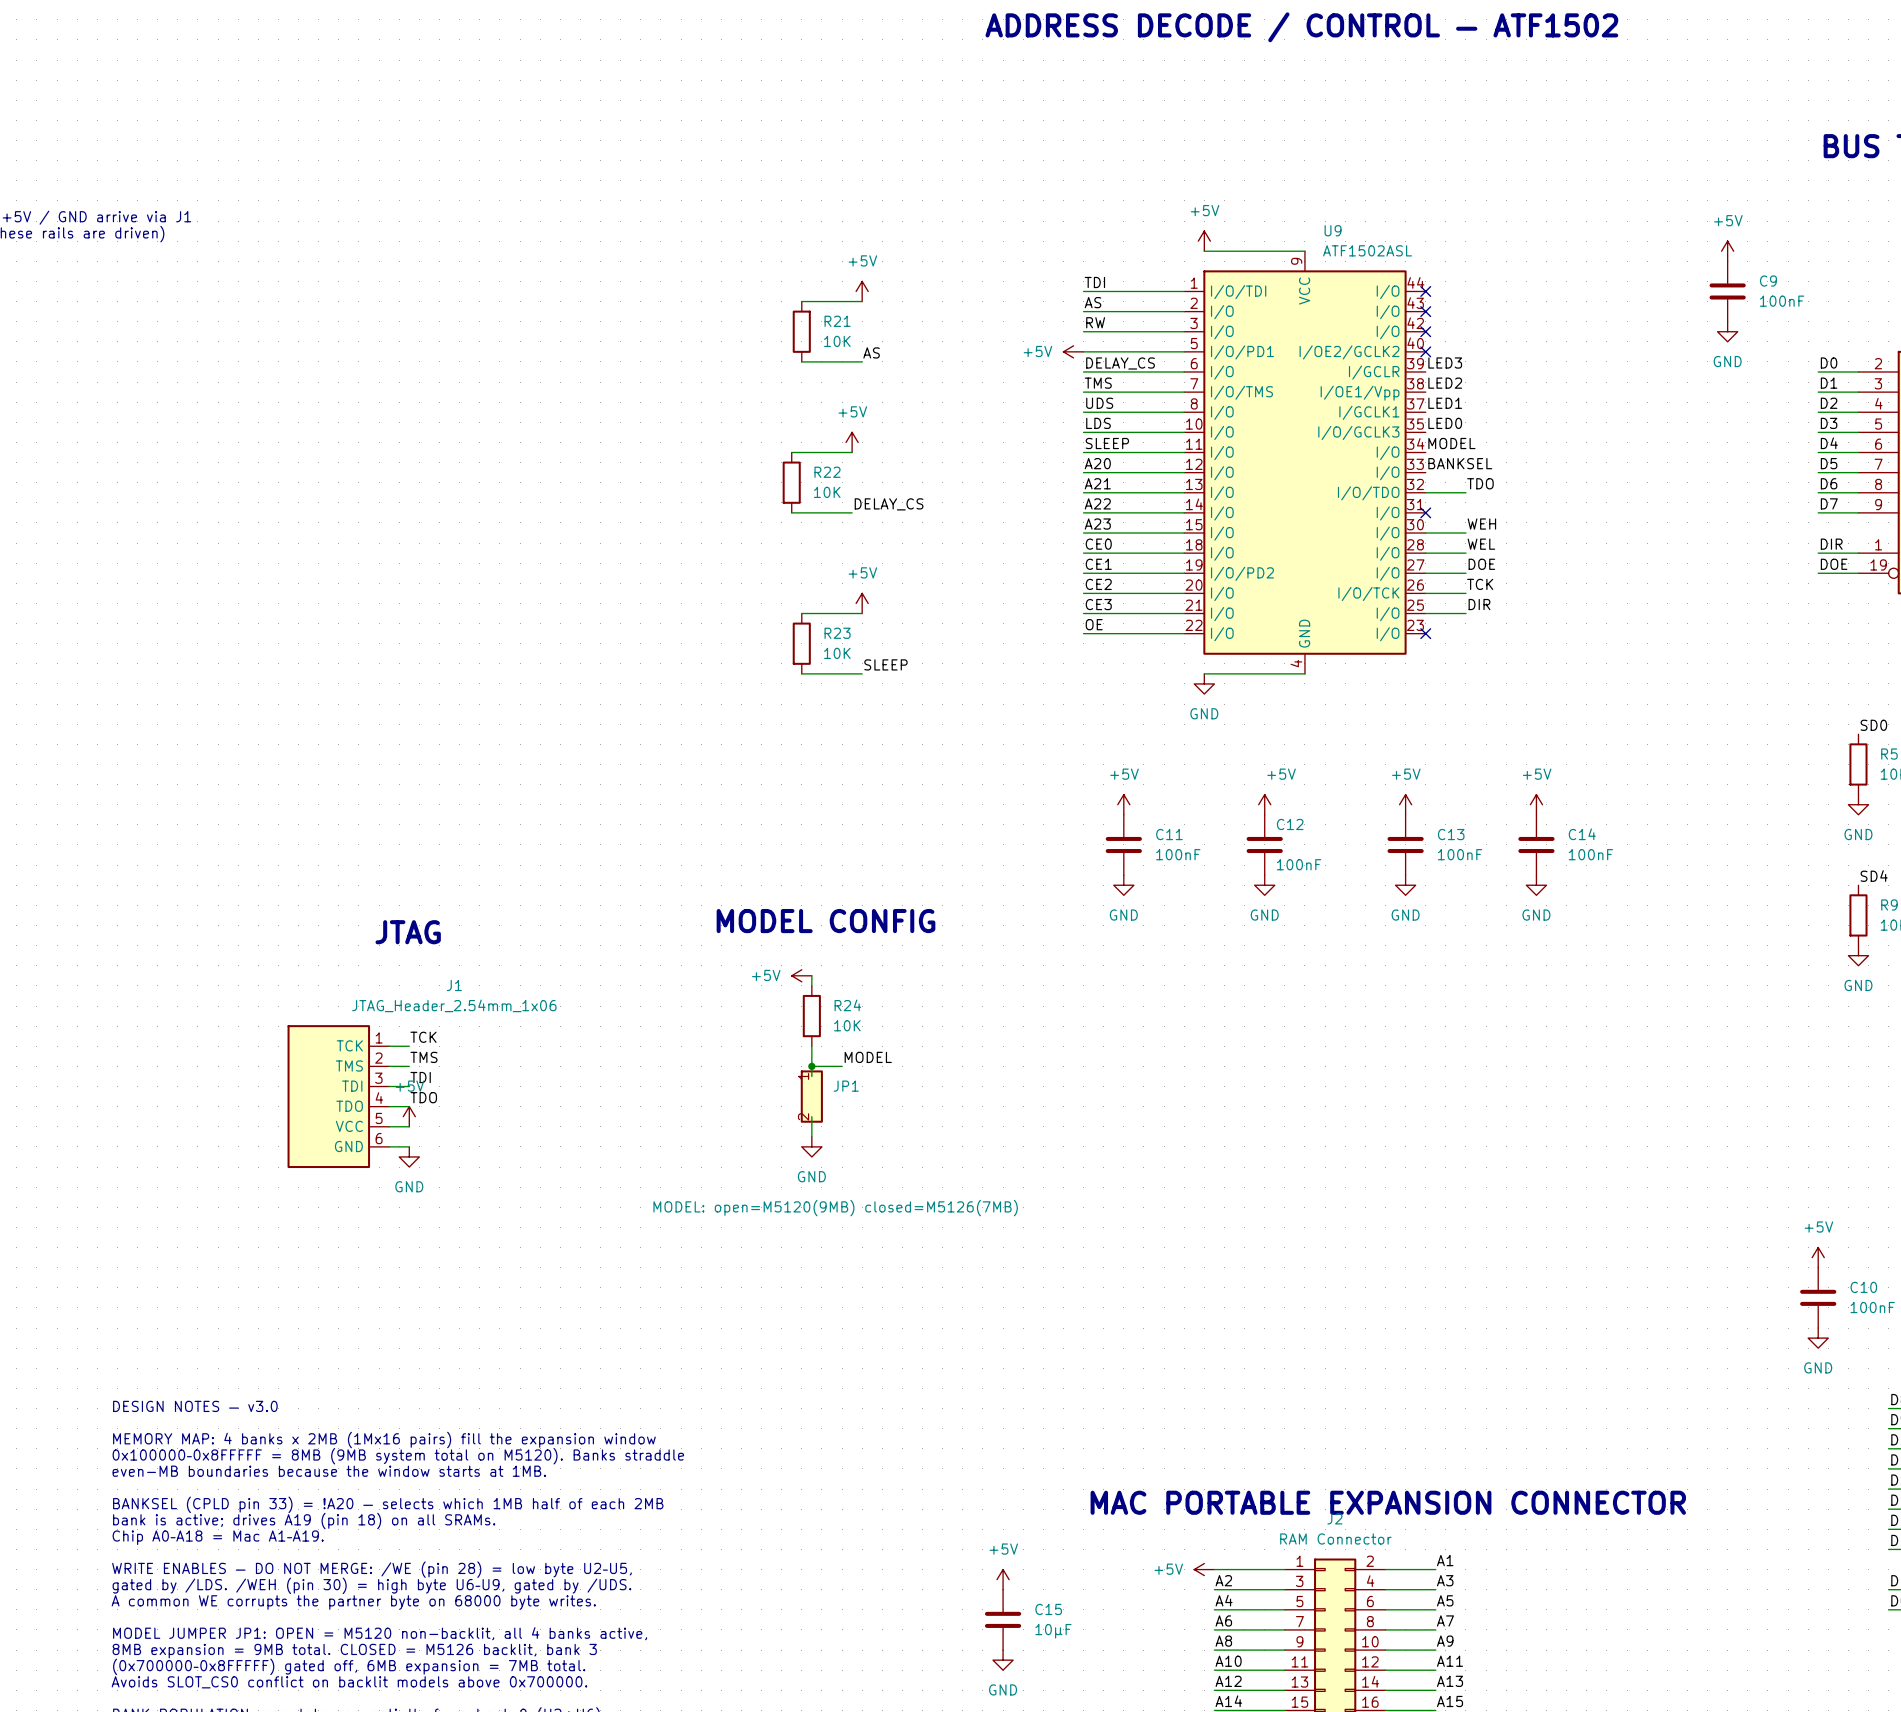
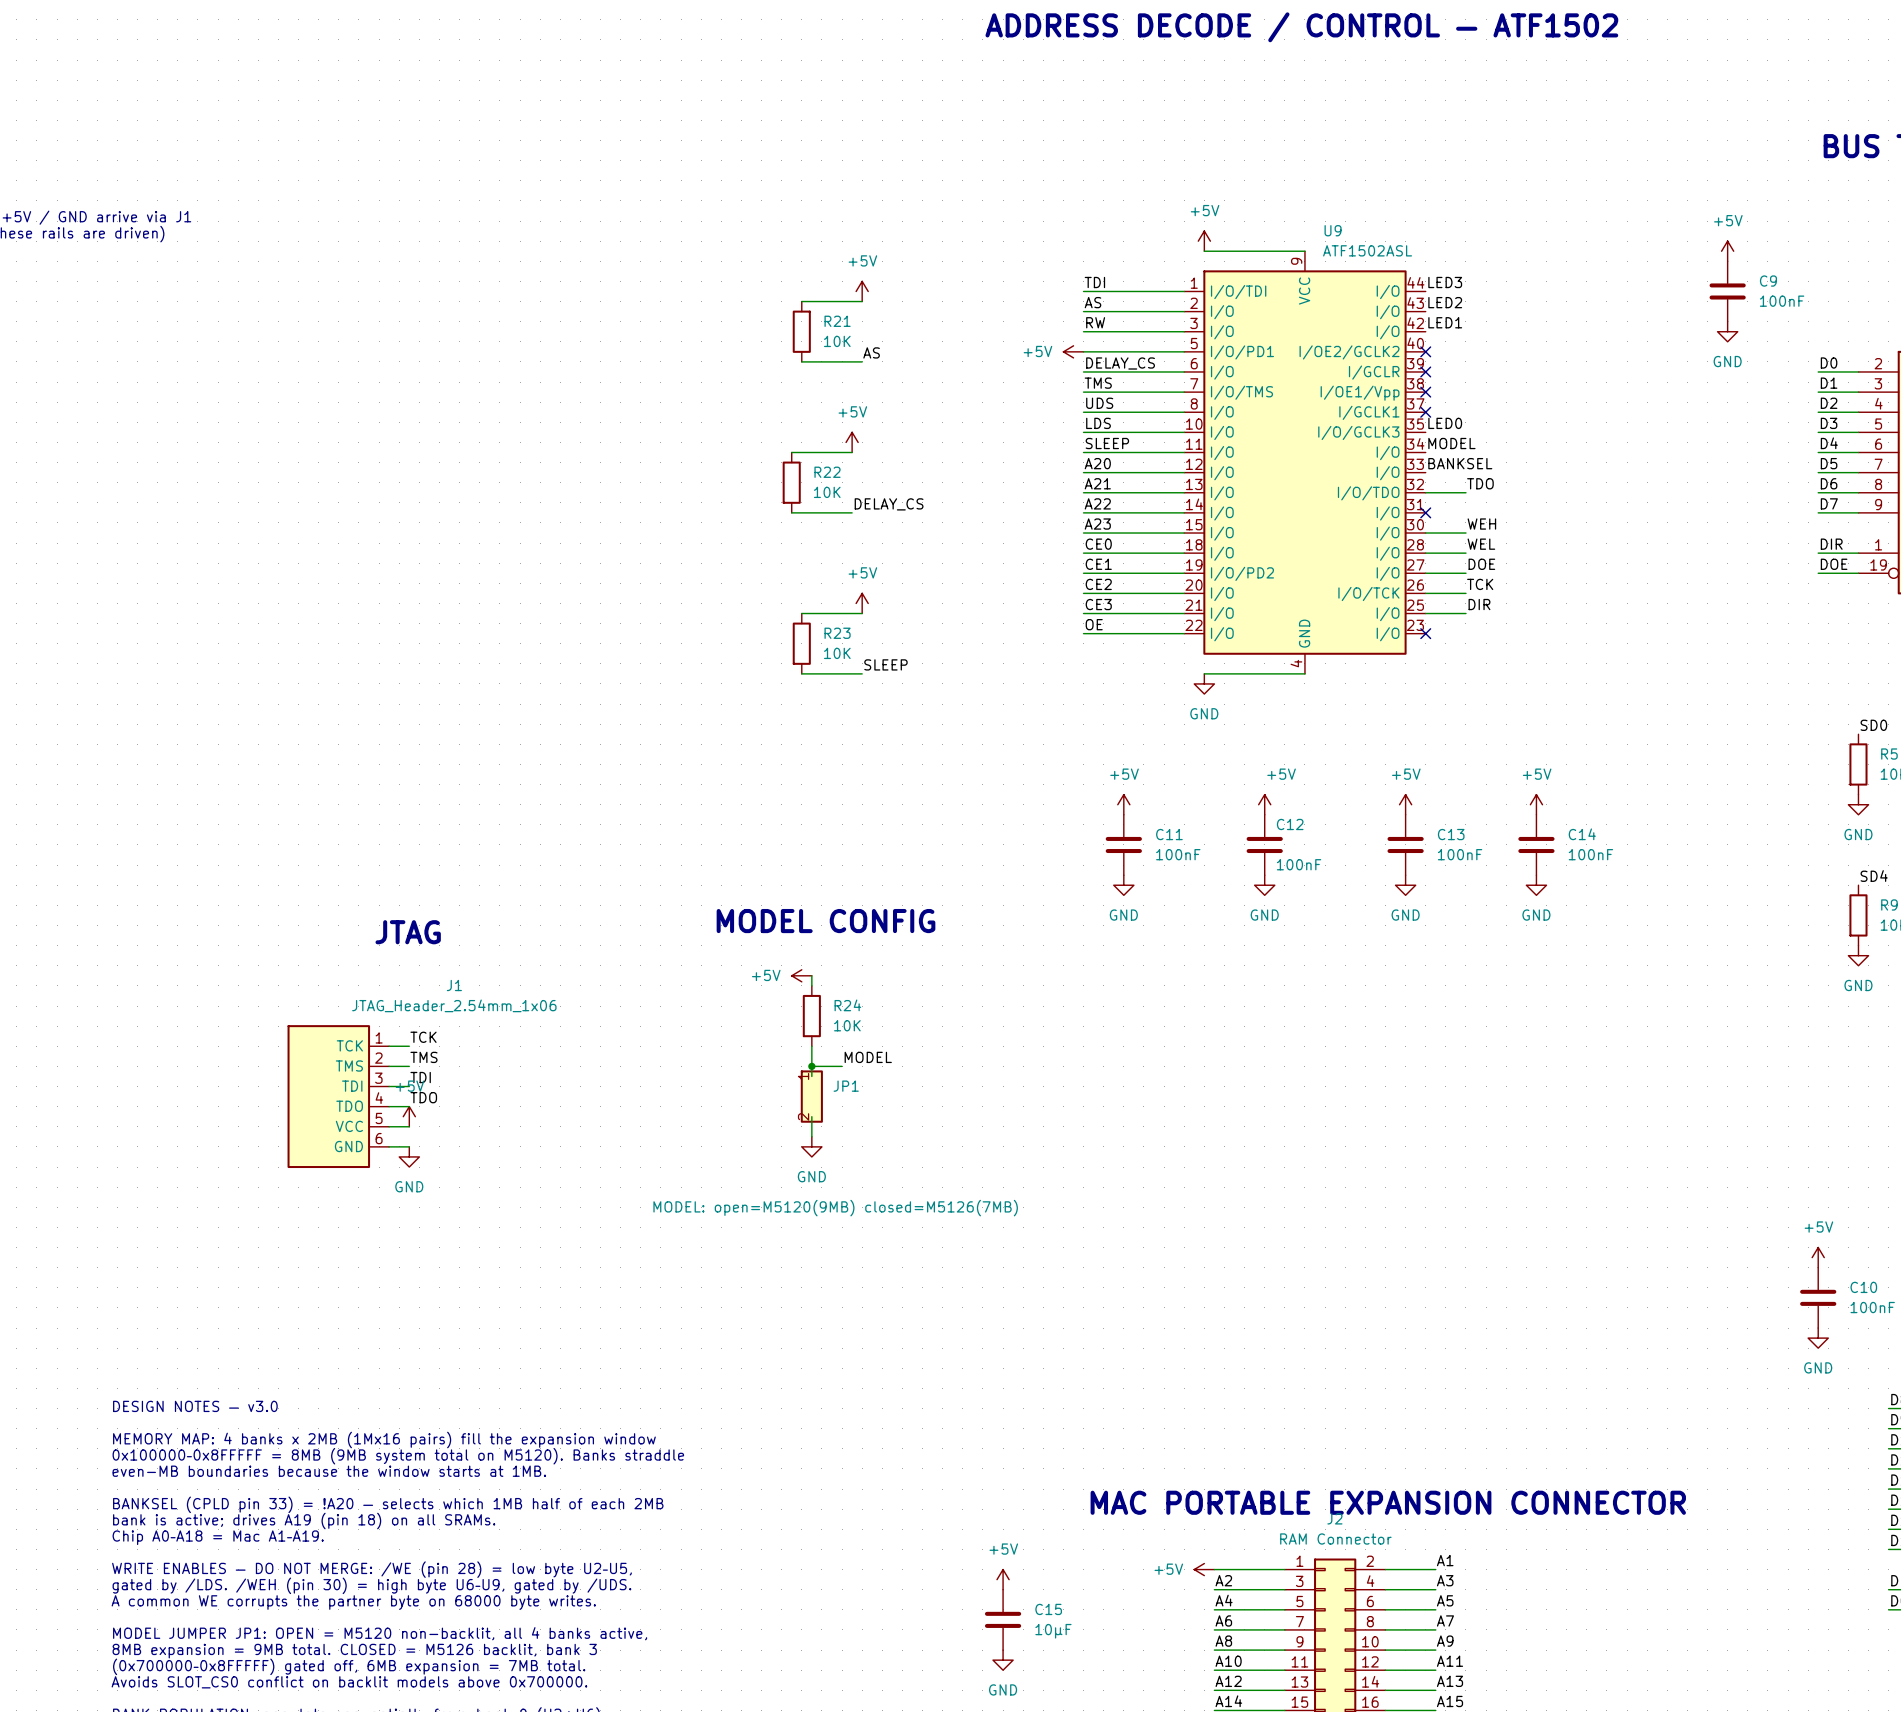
no-connect mark: (1425, 291) -> none
no-connect mark: (1425, 311) -> none
no-connect mark: (1425, 331) -> none
label position: LED3 (1445, 363) -> LED3 (1445, 282)
no-connect mark: none -> (1425, 371)
label position: LED2 (1445, 383) -> LED2 (1445, 302)
no-connect mark: none -> (1425, 392)
label position: LED1 (1445, 403) -> LED1 (1445, 322)
no-connect mark: none -> (1425, 412)

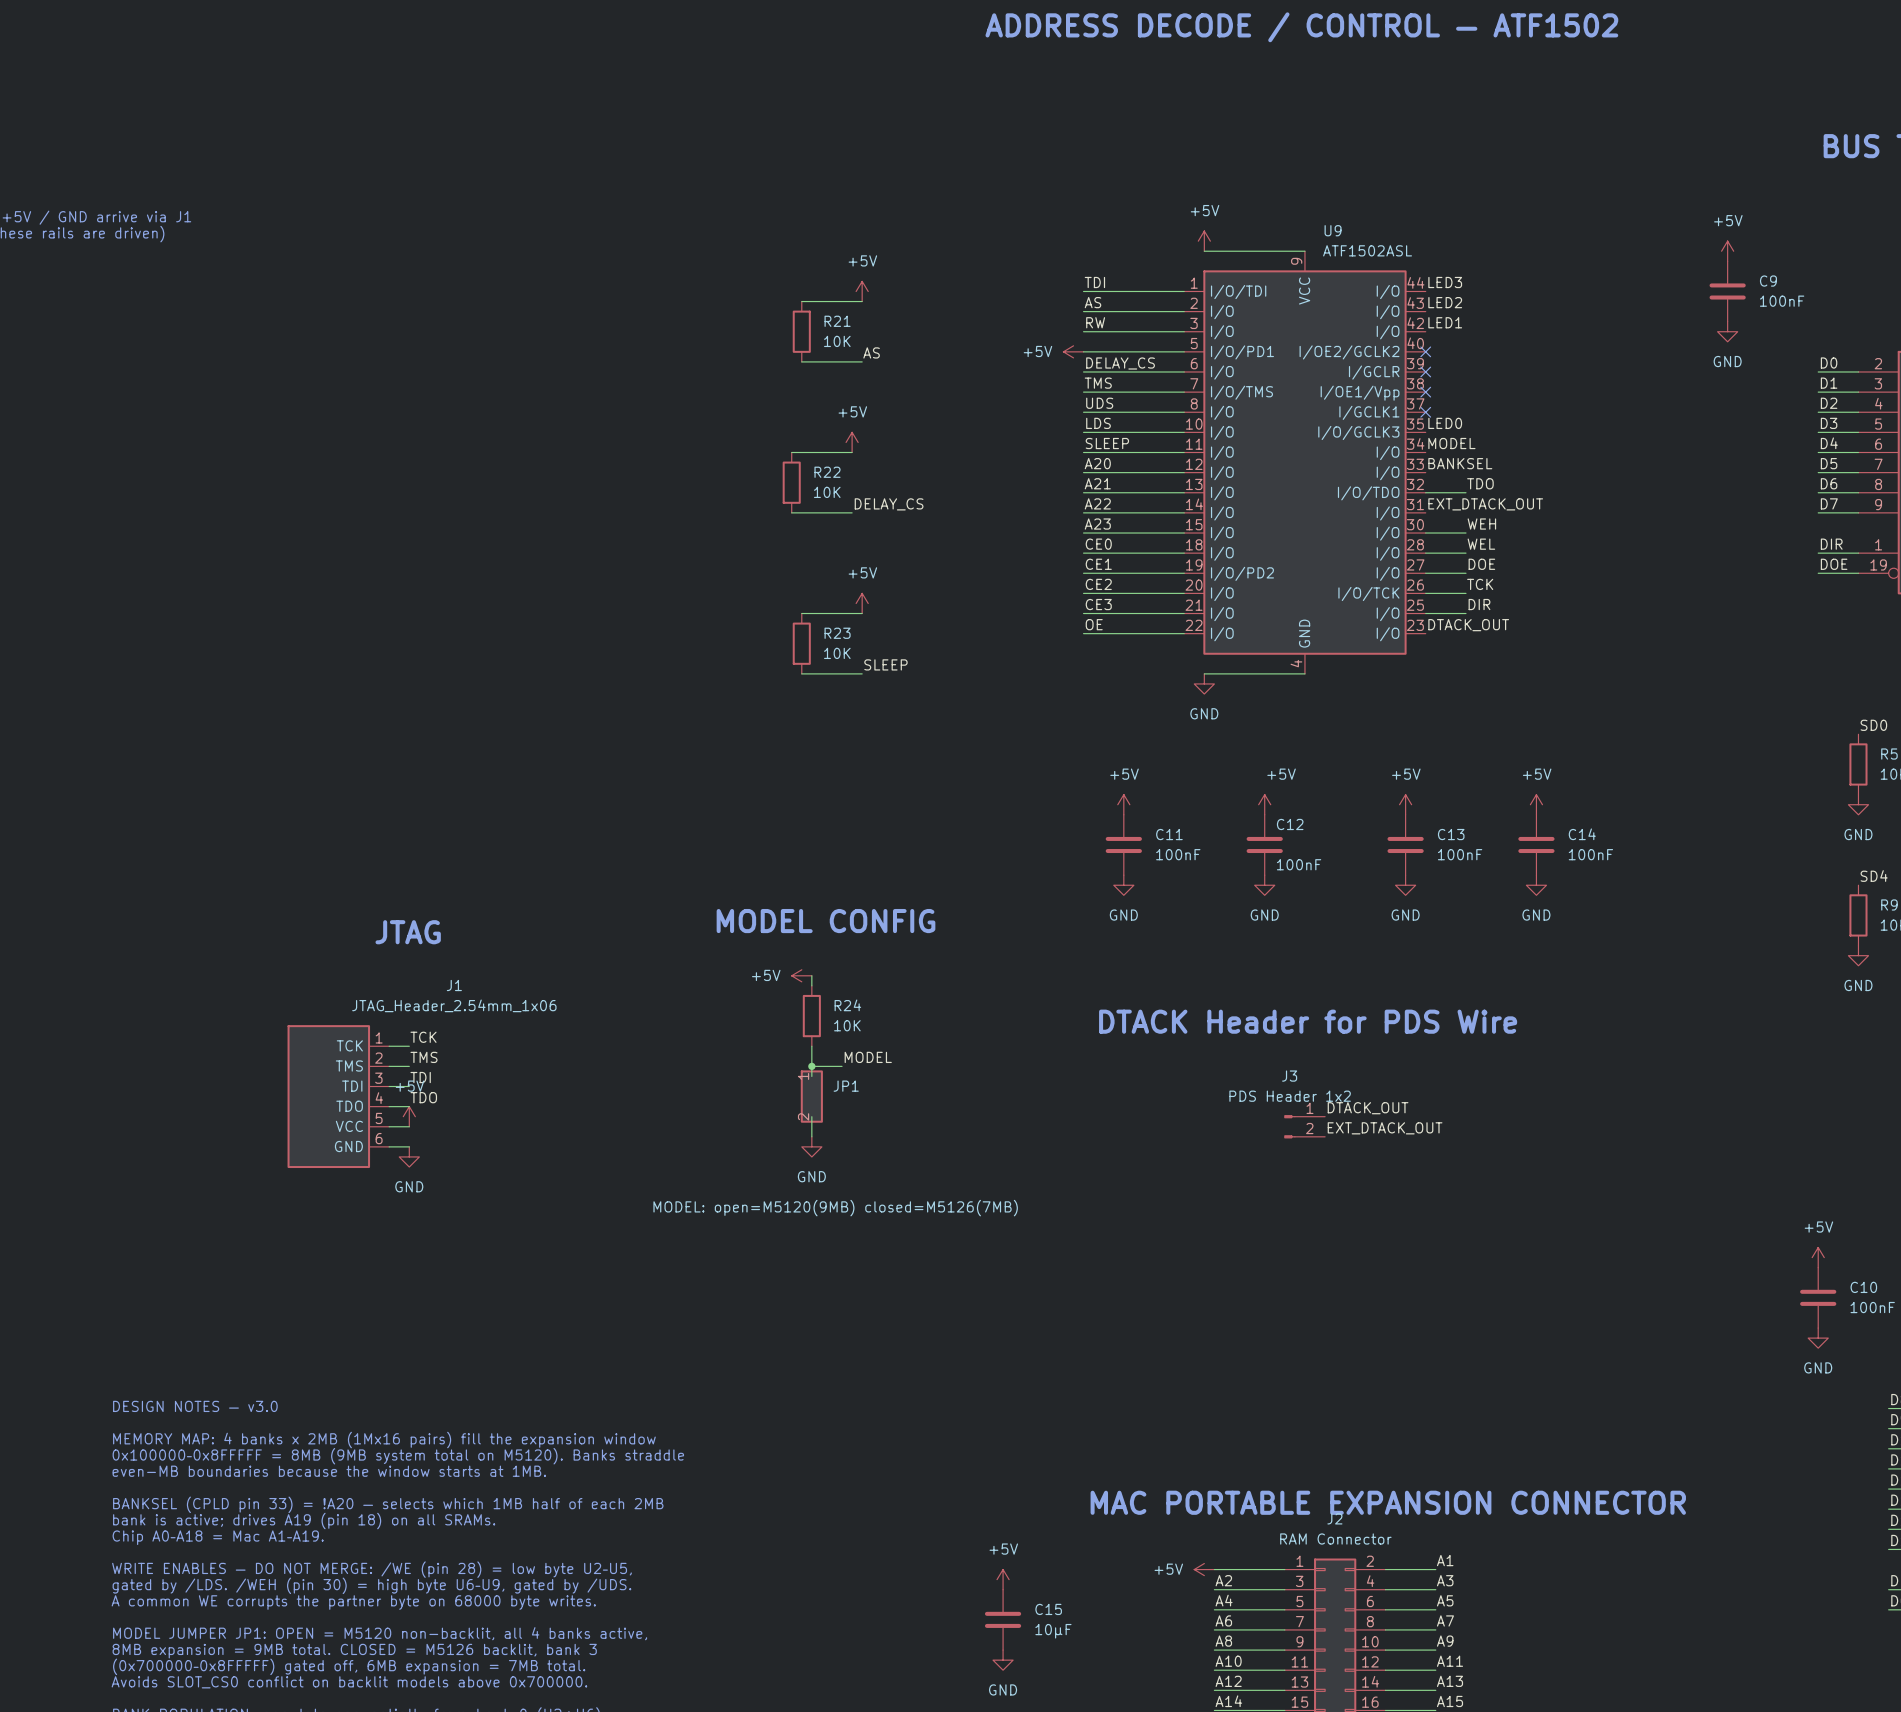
label: none -> EXT_DTACK_OUT (1485, 504)
no-connect mark: (1425, 512) -> none
label: none -> DTACK_OUT (1468, 625)
no-connect mark: (1425, 633) -> none
text: none -> DTACK Header for PDS Wire (1308, 1021)
label: none -> DTACK_OUT (1368, 1108)
J3: none -> PDS Header 1x2 (1304, 1126)
label: none -> EXT_DTACK_OUT (1385, 1128)

